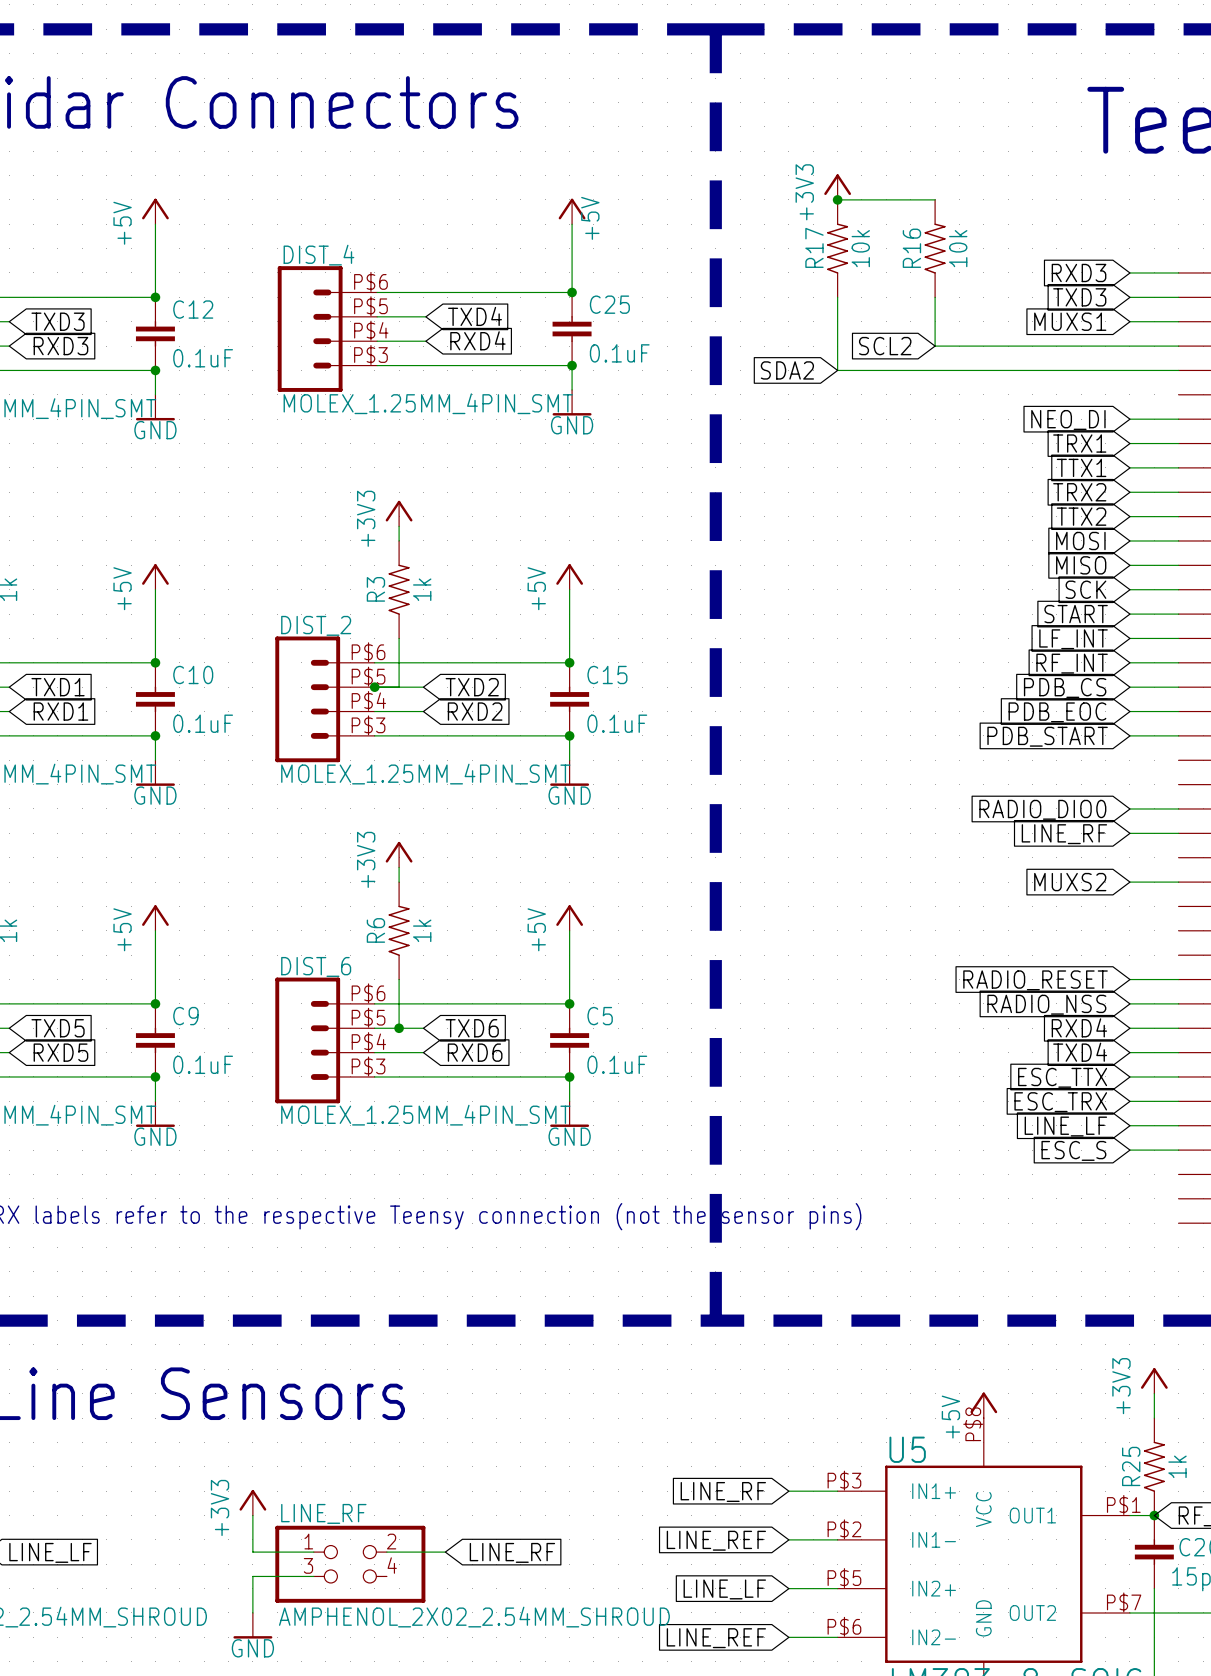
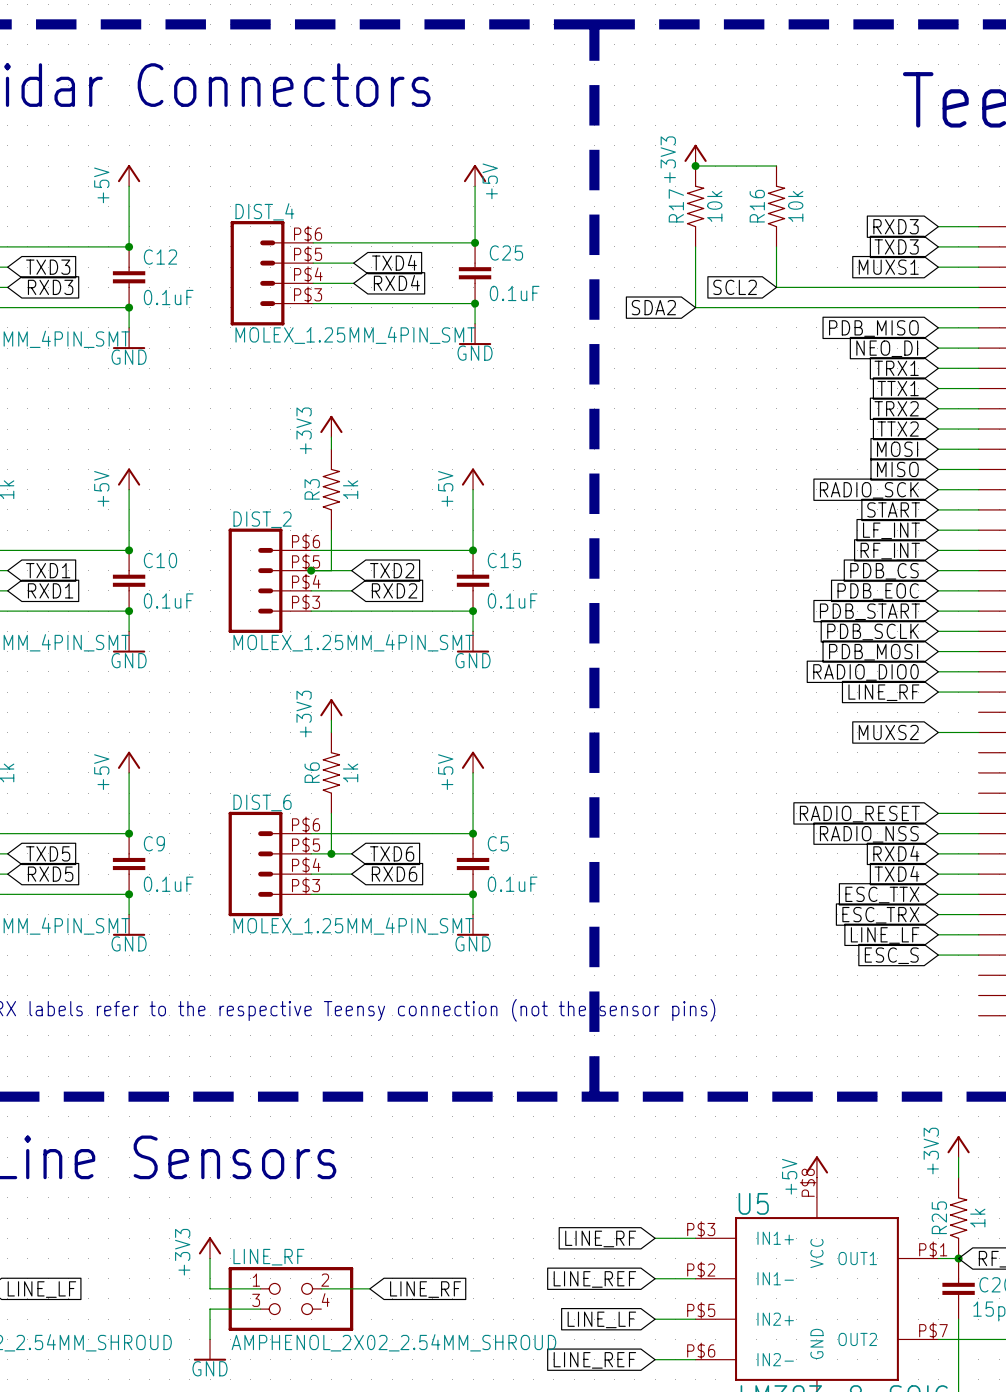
wire: none -> (938, 327) (978, 327)
global label: none -> PDB_MISO (873, 328)
global label: SCK (1085, 589) -> RADIO_SCK (869, 490)
wire: none -> (938, 631) (978, 631)
global label: none -> PDB_SCLK (872, 632)
wire: none -> (938, 651) (978, 651)
global label: none -> PDB_MOSI (873, 652)

